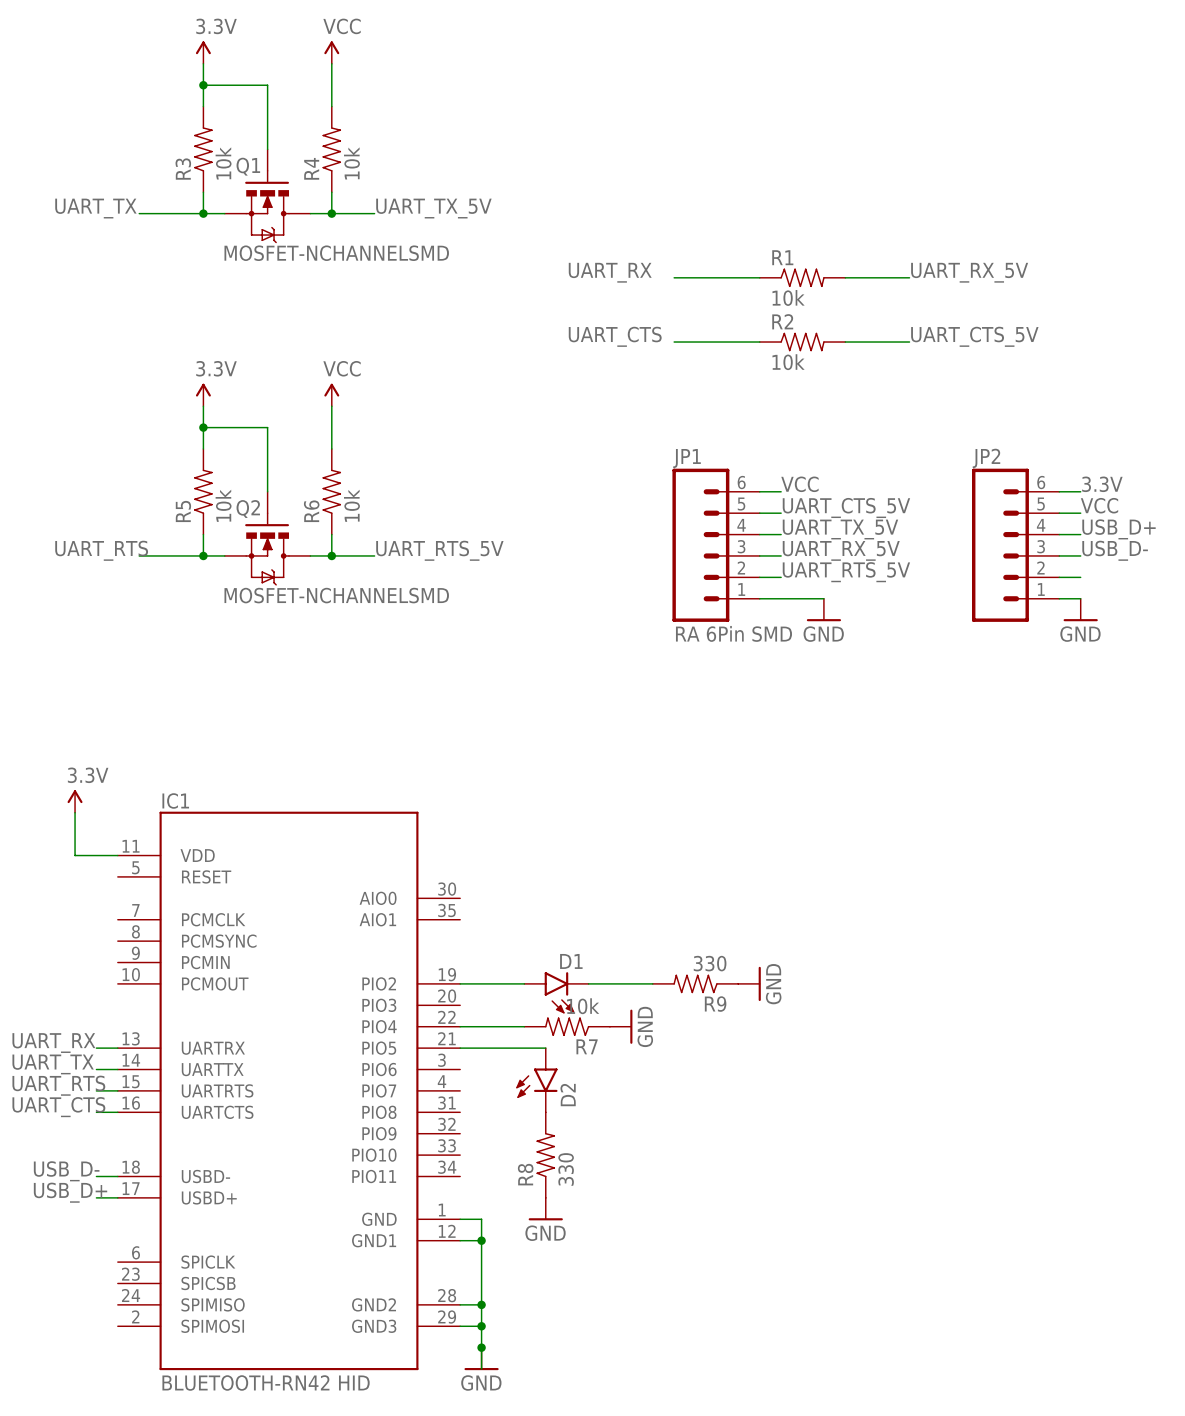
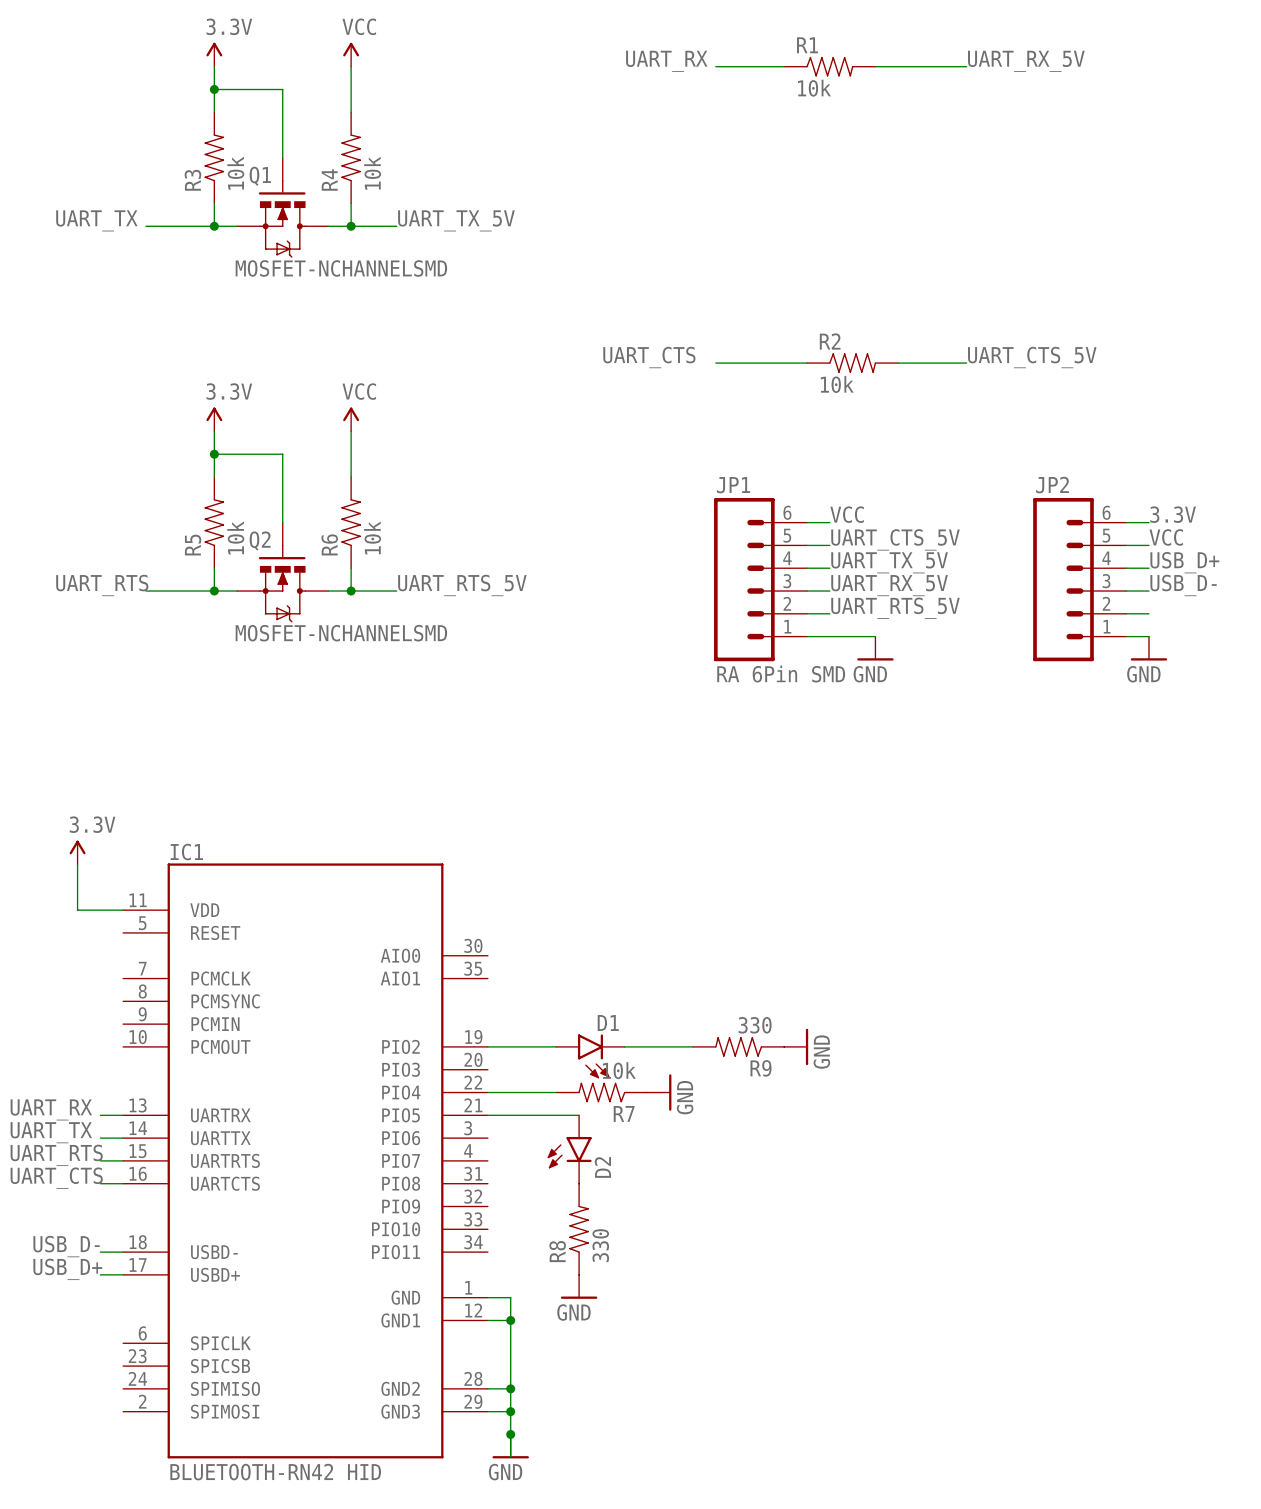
label: none -> UART_RX (666, 61)
label: none -> UART_RX_5V (1026, 61)
wire: none -> (715, 66) (784, 66)
wire: none -> (875, 66) (966, 66)
label: UART_RX (610, 272) -> none
label: UART_RX_5V (969, 272) -> none
wire: (674, 277) (759, 277) -> none
R1 position: (802, 277) -> (829, 66)
wire: (845, 277) (909, 277) -> none

